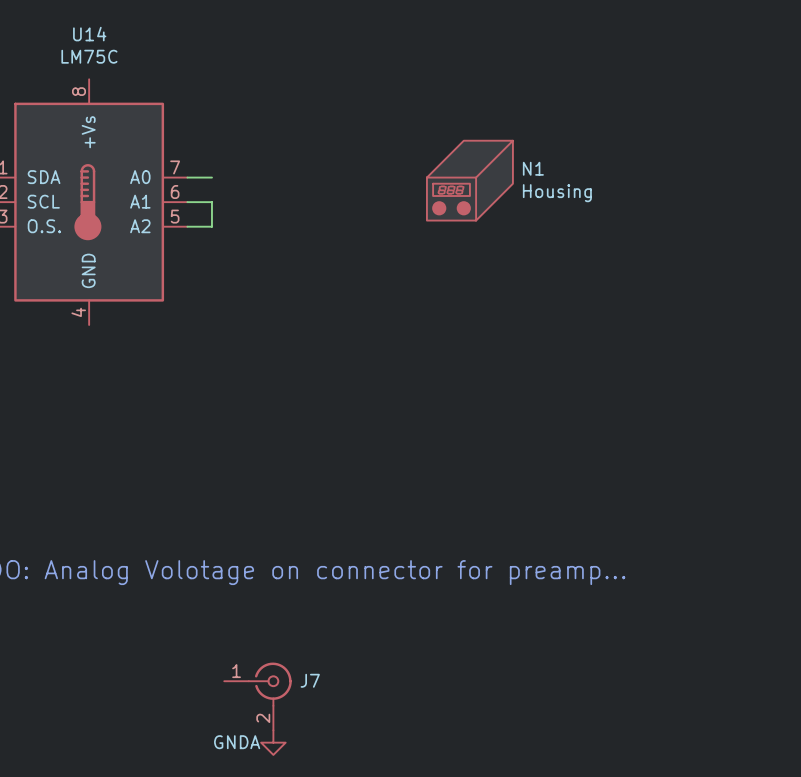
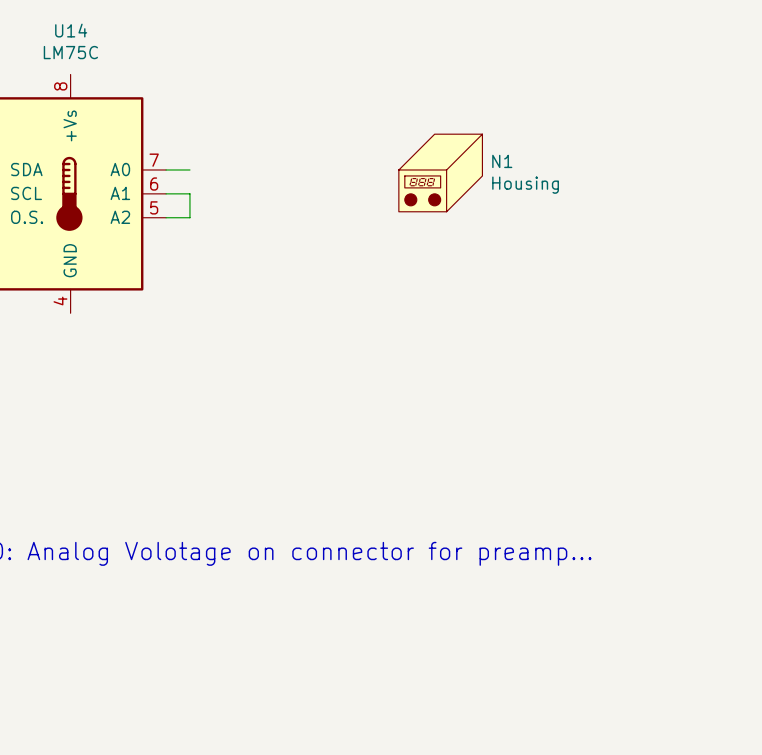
J7: (258, 696) -> none
power symbol: GNDA (273, 742) -> none

